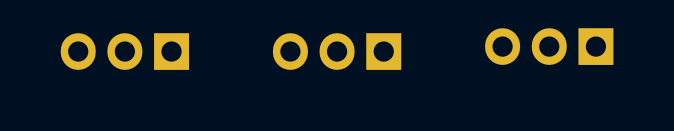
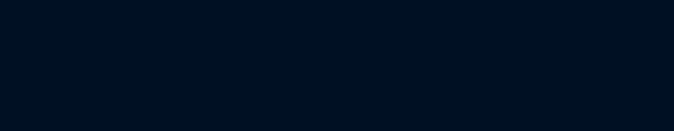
part: (549, 46) -> none
part: (124, 51) -> none
part: (337, 51) -> none

